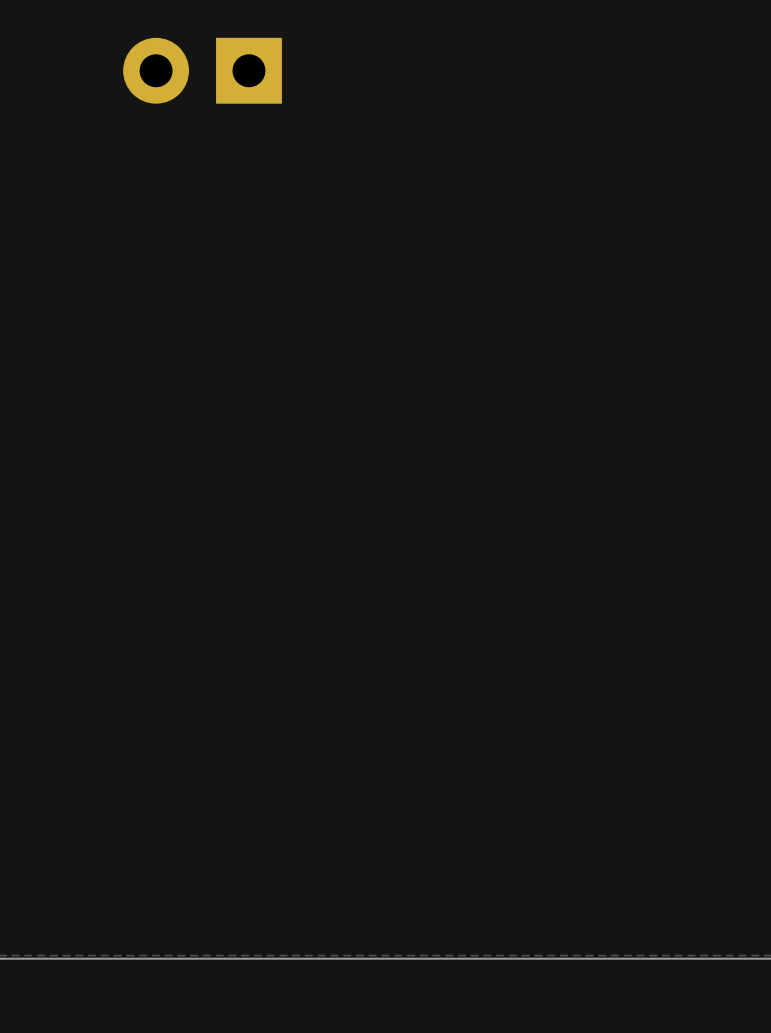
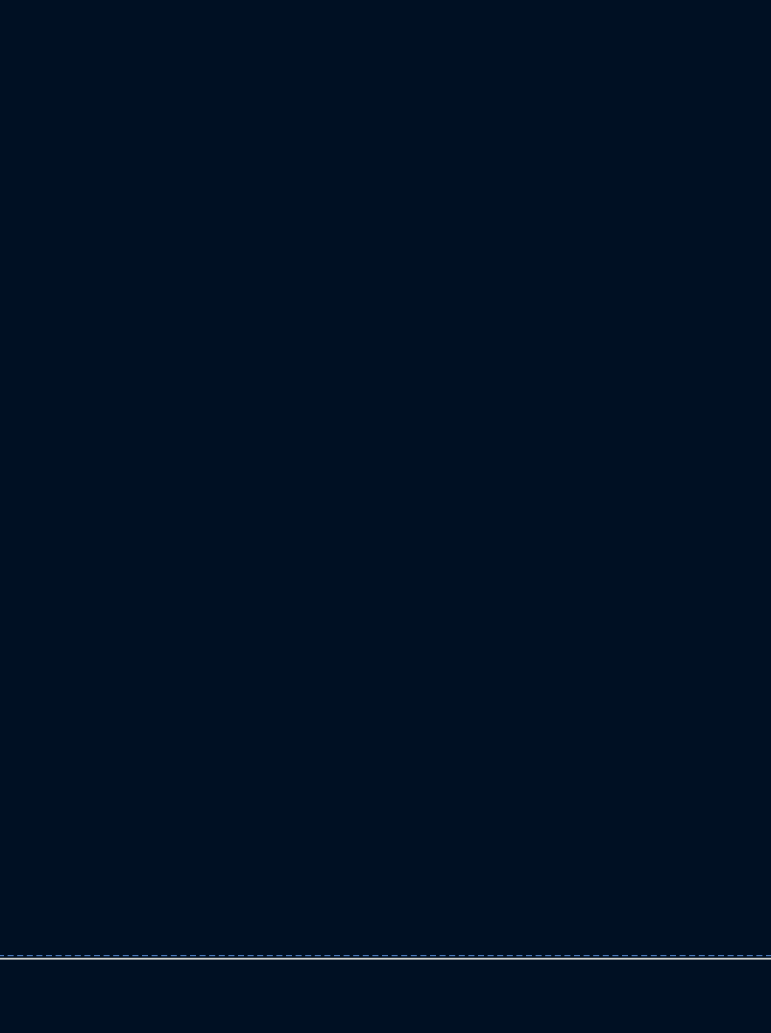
part: (202, 70) -> none

